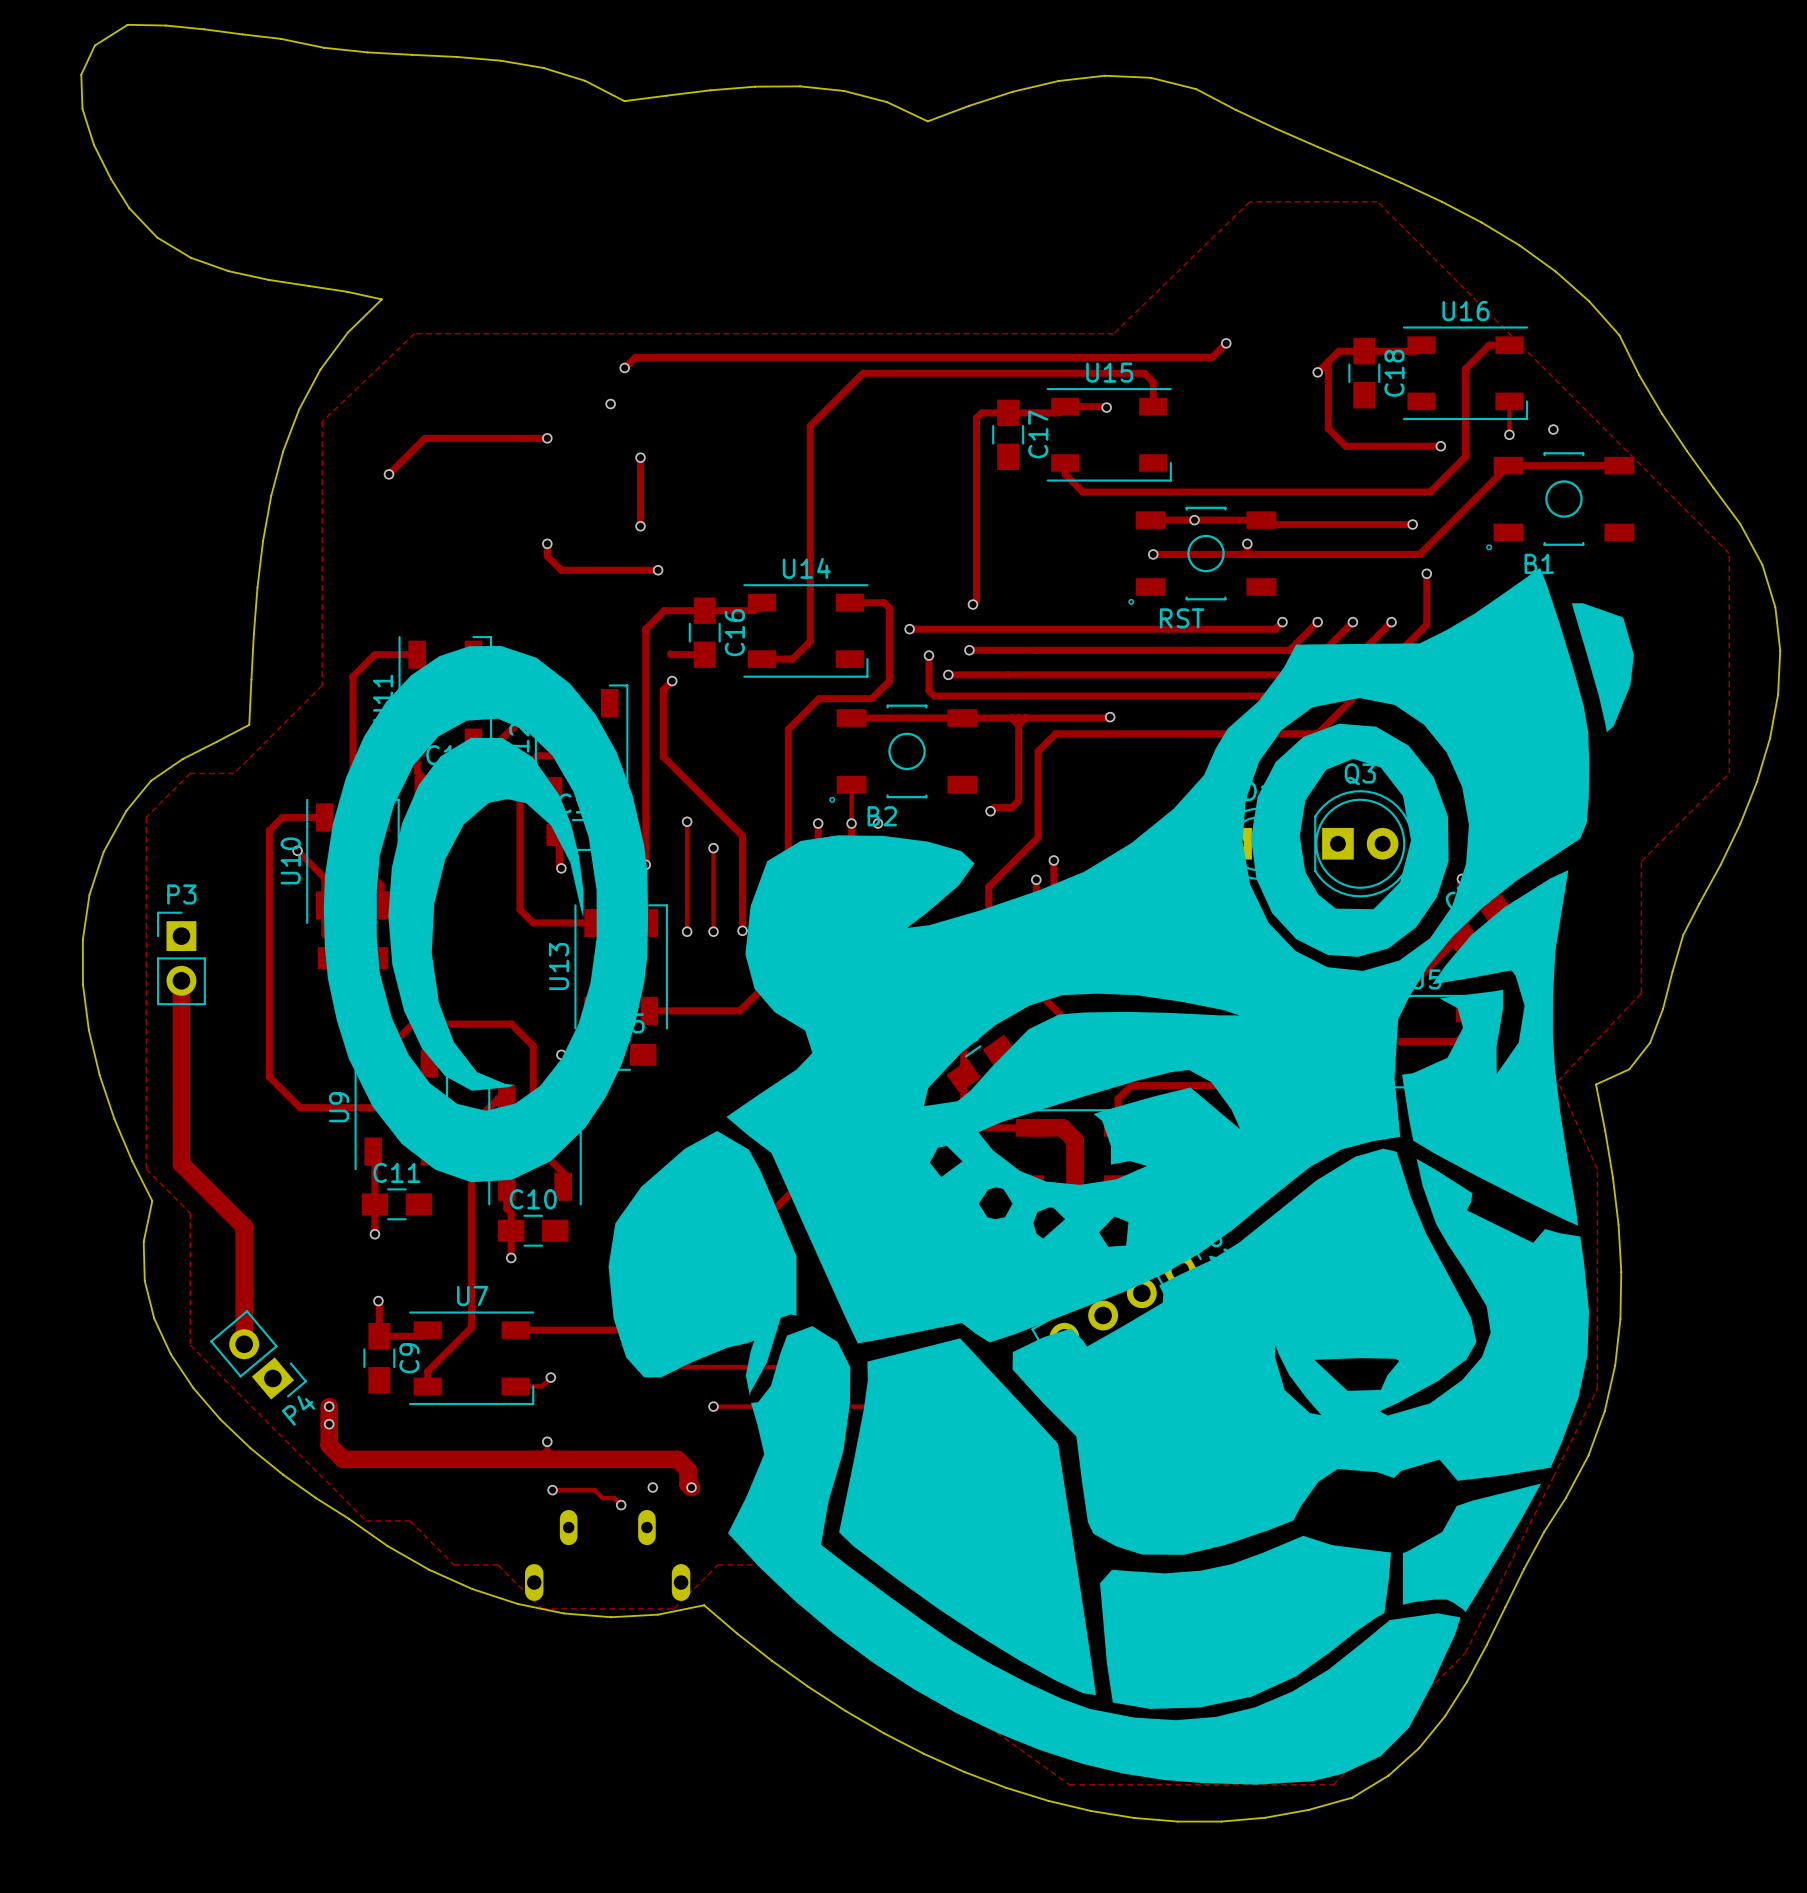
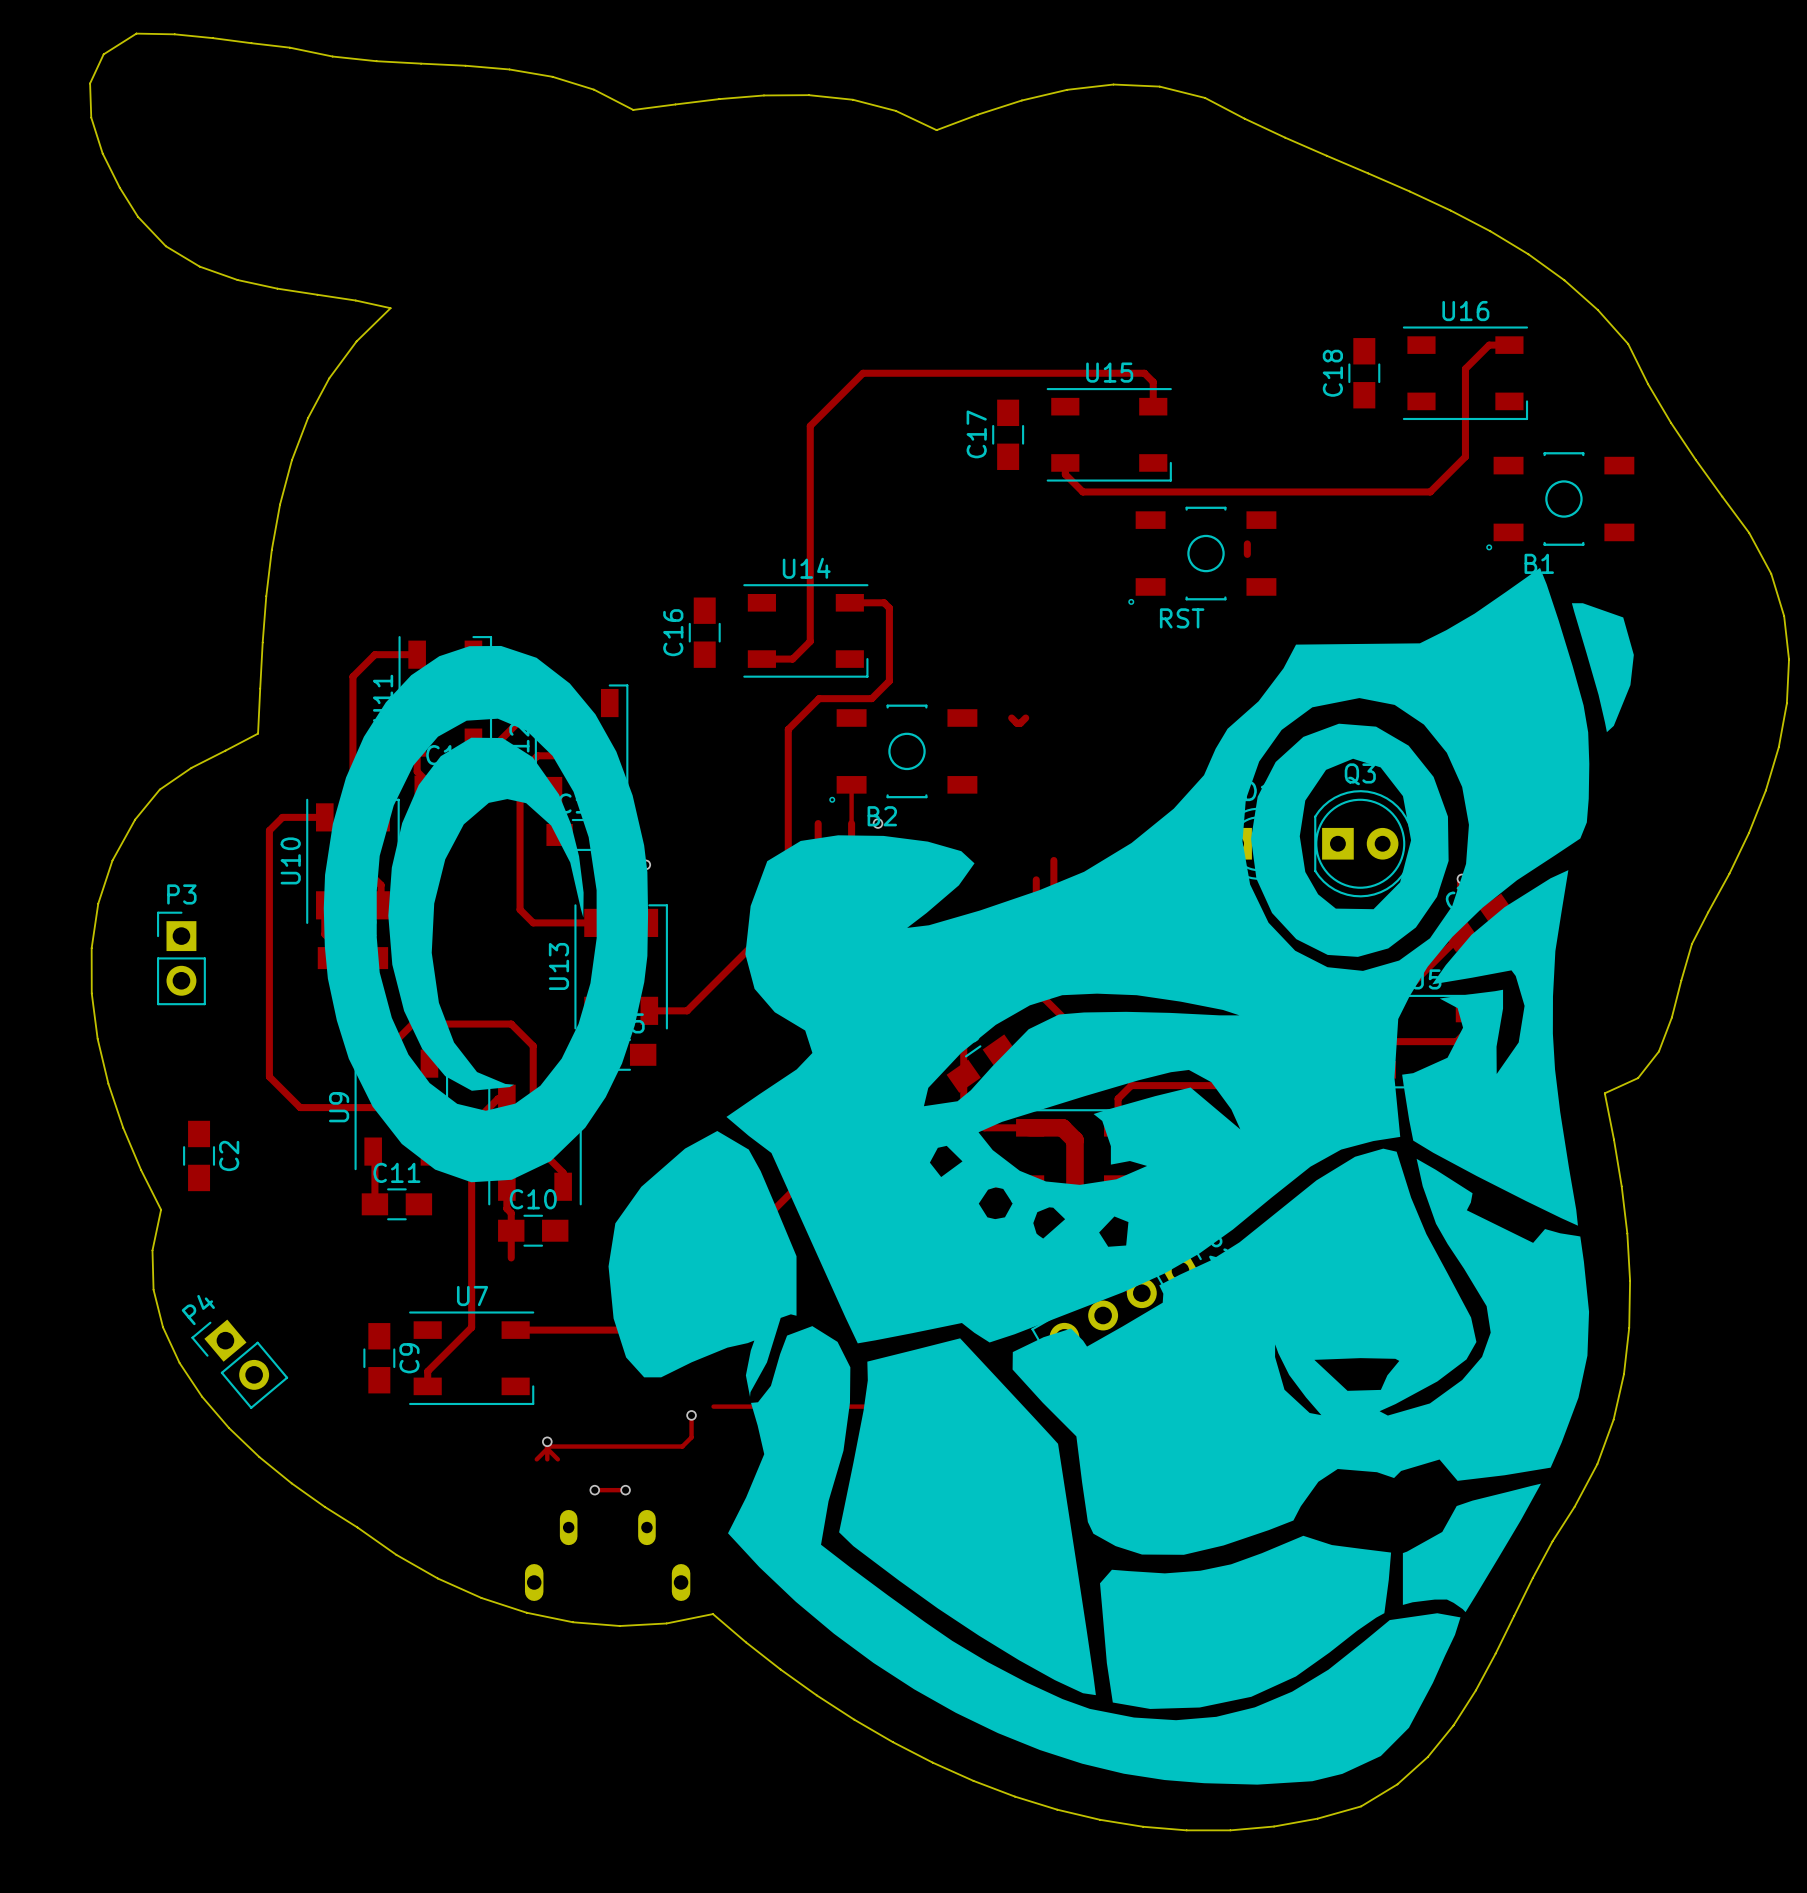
zone outline: (1249, 201) (1377, 201) (1729, 553) (1729, 773) (1641, 861) (1641, 993) (1557, 1081) (1597, 1169) (1597, 1389) (1465, 1652) (1333, 1784) (1069, 1784) (761, 1564) (717, 1564) (673, 1608) (542, 1608) (498, 1564) (454, 1564) (410, 1520) (366, 1520) (190, 1345) (190, 1213) (146, 1169) (146, 817) (190, 773) (234, 773) (322, 685) (322, 421) (414, 333) (1113, 333) (1249, 201) -> none
track: (1226, 343) (1212, 357) (635, 357) (624, 367) -> none
via: (1226, 343) -> none
track: (1421, 345) (1415, 351) (1338, 351) (1317, 372) -> none
track: (1328, 361) (1328, 428) (1345, 446) (1440, 446) -> none
via: (624, 367) -> none
via: (1317, 372) -> none
C18 name position: C18 (1394, 373) -> C18 (1332, 373)
track: (1509, 401) (1509, 434) -> none
via: (610, 404) -> none
track: (1106, 407) (1065, 406) (1059, 412) (981, 412) (976, 418) (976, 601) (972, 604) -> none
via: (1106, 407) -> none
via: (1553, 429) -> none
C17 name position: C17 (1038, 434) -> C17 (976, 434)
via: (1509, 434) -> none
track: (547, 438) (425, 438) (389, 474) -> none
via: (547, 438) -> none
via: (1440, 446) -> none
track: (640, 457) (640, 526) -> none
via: (640, 457) -> none
track: (1619, 465) (1508, 465) (1419, 554) (1153, 554) -> none
via: (389, 474) -> none
track: (1150, 520) (1261, 520) (1265, 524) (1412, 524) -> none
via: (1194, 520) -> none
via: (1412, 524) -> none
via: (640, 526) -> none
track: (547, 543) (547, 556) (561, 570) (658, 570) -> none
via: (547, 543) -> none
via: (1247, 543) -> none
via: (1153, 554) -> none
via: (658, 570) -> none
track: (1426, 573) (1426, 624) (1317, 733) (1055, 733) (1038, 751) (1038, 837) (988, 886) (988, 920) -> none
via: (1426, 573) -> none
track: (761, 602) (753, 610) (664, 610) (645, 629) (645, 864) -> none
via: (972, 604) -> none
track: (1282, 622) (1275, 629) (909, 629) -> none
via: (1282, 622) -> none
track: (1317, 622) (1289, 650) (969, 650) -> none
via: (1317, 622) -> none
track: (1352, 622) (1300, 674) (948, 674) -> none
via: (1352, 622) -> none
track: (1391, 622) (1317, 696) (934, 696) (928, 690) (928, 655) -> none
via: (1391, 622) -> none
via: (909, 629) -> none
C16 name position: C16 (734, 632) -> C16 (673, 632)
via: (969, 650) -> none
track: (670, 653) (704, 654) -> none
via: (928, 655) -> none
via: (948, 674) -> none
track: (672, 681) (663, 689) (663, 756) (742, 835) (742, 930) -> none
via: (672, 681) -> none
track: (1018, 717) (1018, 800) (1011, 807) (994, 807) (990, 811) -> none
track: (1110, 717) (851, 717) -> none
via: (1110, 717) -> none
via: (990, 811) -> none
track: (687, 821) (687, 931) -> none
via: (687, 821) -> none
via: (818, 823) -> none
via: (851, 823) -> none
track: (559, 834) (559, 866) (561, 868) -> none
track: (713, 848) (713, 931) -> none
via: (713, 848) -> none
track: (297, 850) (324, 878) (324, 905) -> none
via: (297, 850) -> none
via: (1053, 860) -> none
via: (561, 868) -> none
via: (1036, 879) -> none
track: (788, 909) (788, 962) (739, 1010) (687, 1010) -> (788, 909) (687, 1010)
drawing position: (930, 923) -> (939, 931)
via: (742, 930) -> none
via: (687, 931) -> none
via: (713, 931) -> none
track: (181, 980) (181, 1163) (244, 1226) (244, 1344) -> none
via: (561, 1054) -> none
C2: none -> (199, 1155)
track: (374, 1204) (374, 1234) -> none
via: (374, 1234) -> none
via: (511, 1257) -> none
track: (378, 1301) (379, 1336) (421, 1336) (427, 1330) -> none
via: (378, 1301) -> none
P4 rotation: 0° (258, 1354) -> 180° (239, 1364)
track: (660, 1367) (805, 1367) -> none
track: (550, 1377) (542, 1386) (515, 1386) -> none
via: (550, 1377) -> none
track: (329, 1406) (329, 1445) (343, 1459) (677, 1459) (688, 1469) (688, 1484) (691, 1487) -> none
via: (329, 1406) -> none
via position: (713, 1406) -> (691, 1415)
track: none -> (691, 1415) (691, 1437) (682, 1446) (546, 1446)
via: (329, 1424) -> none
via: (652, 1487) -> none
via: (691, 1487) -> none
track: (552, 1490) (594, 1490) (602, 1498) (614, 1498) (621, 1505) -> none
via: (552, 1490) -> none
track: none -> (594, 1490) (625, 1490)
via: none -> (594, 1490)
via: none -> (625, 1490)
via: (621, 1505) -> none

